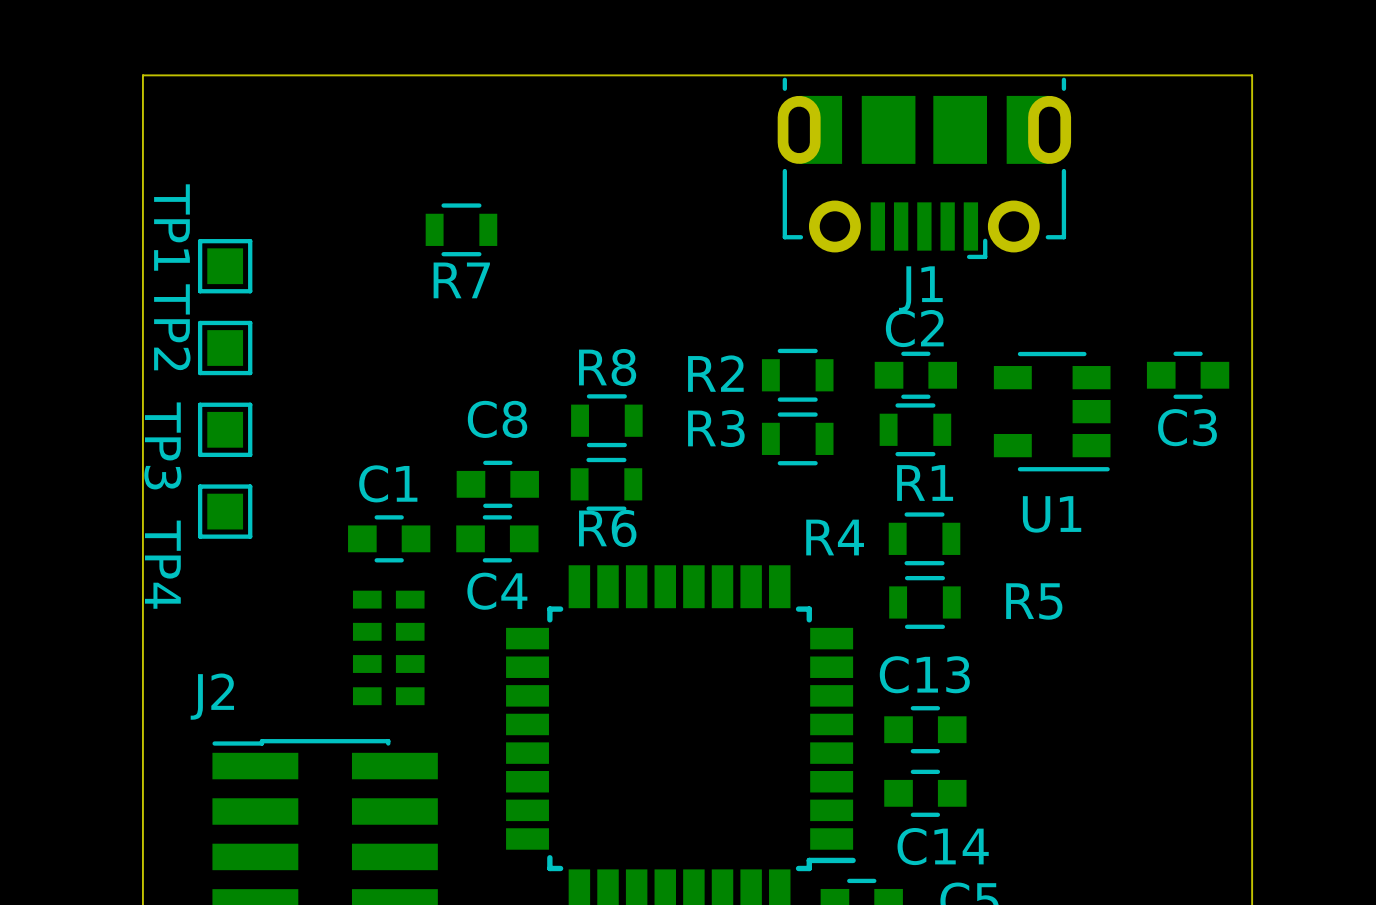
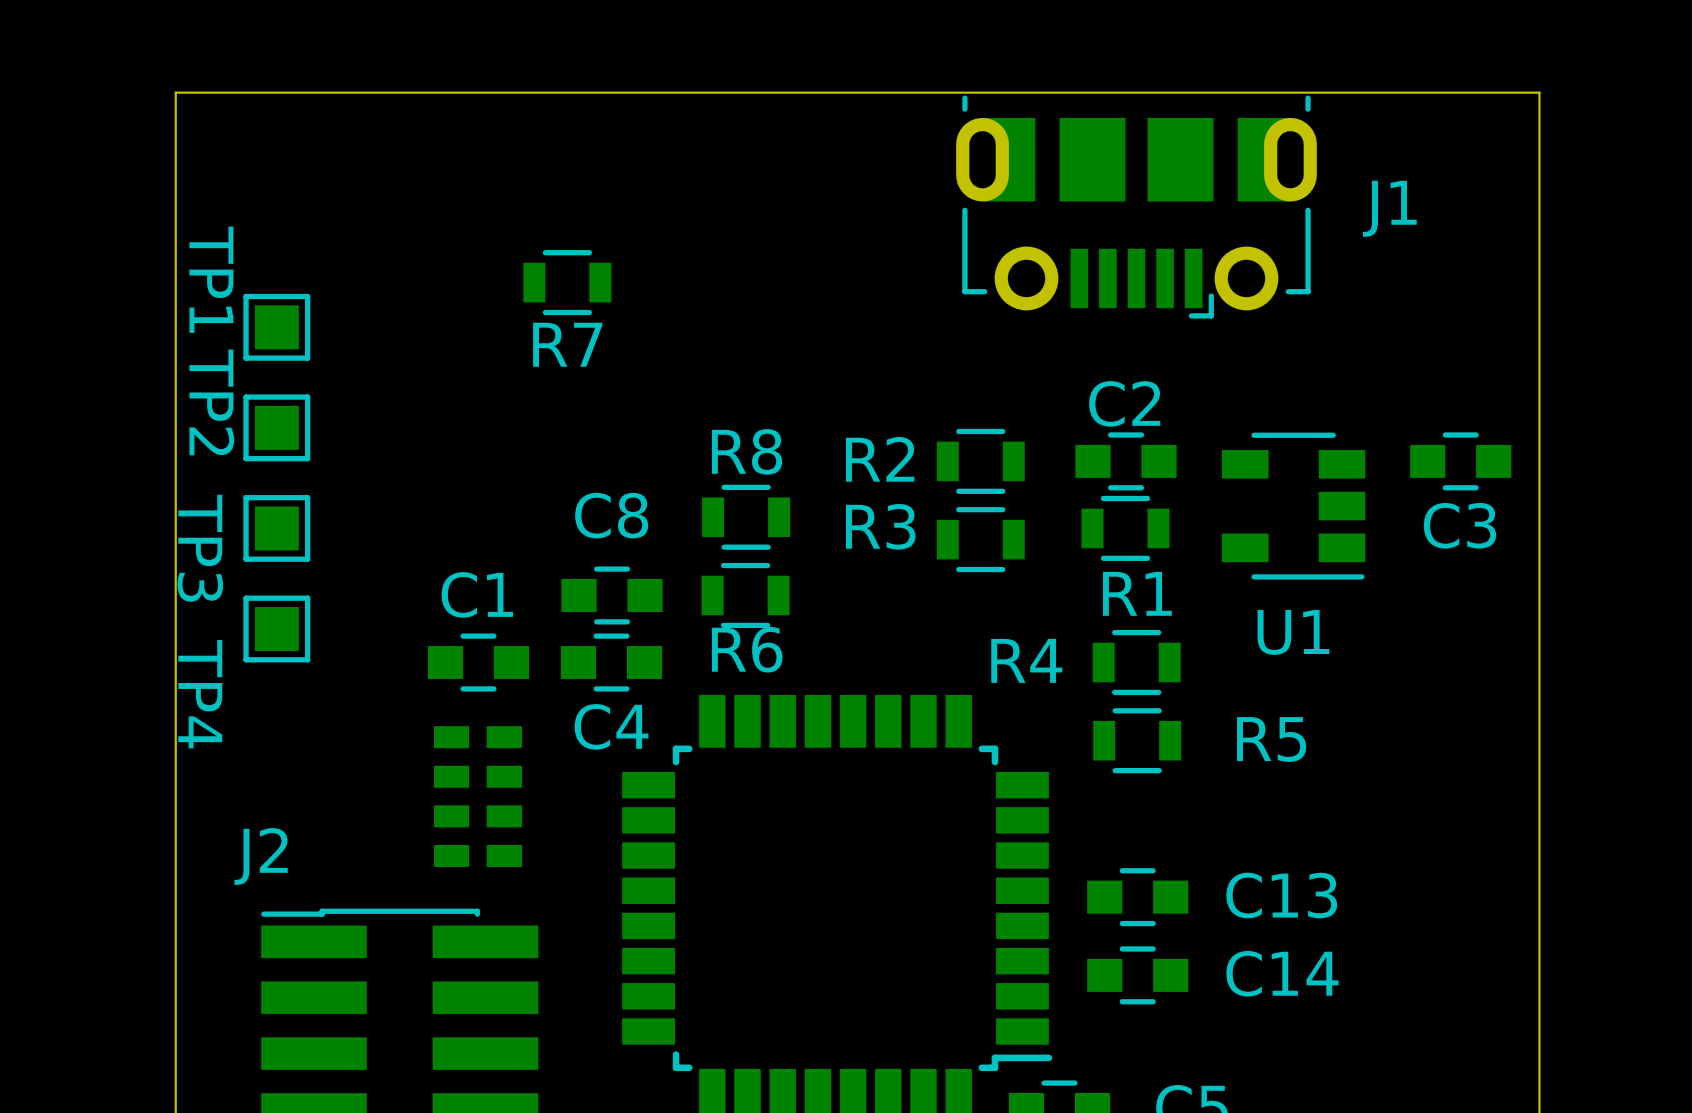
J1 name position: J1 (920, 289) -> J1 (1389, 208)
C13 name position: C13 (924, 674) -> C13 (1281, 895)
C14 name position: C14 (943, 846) -> C14 (1282, 973)

